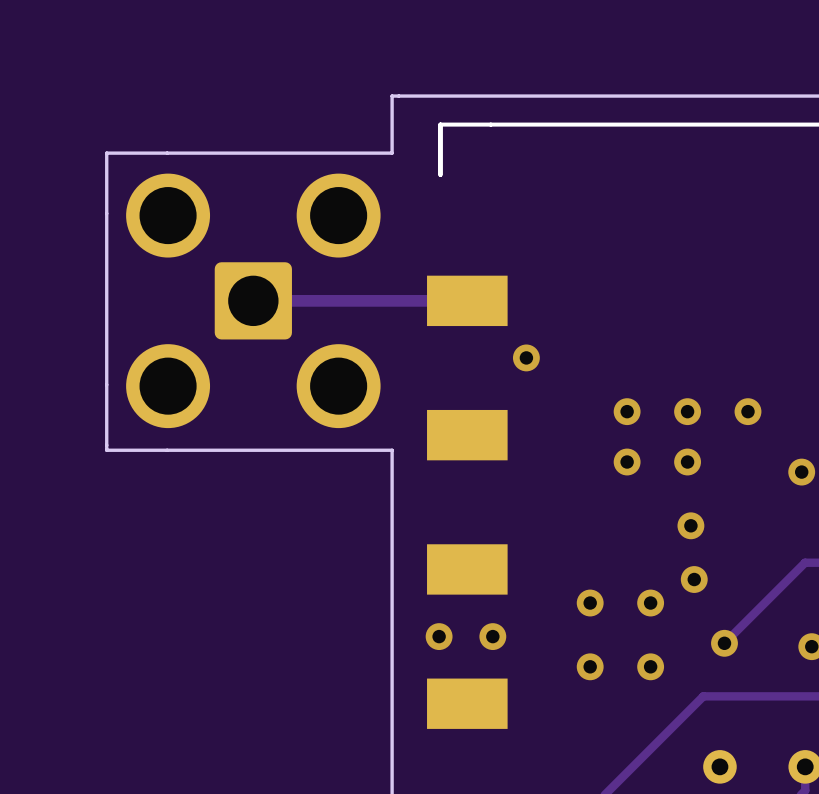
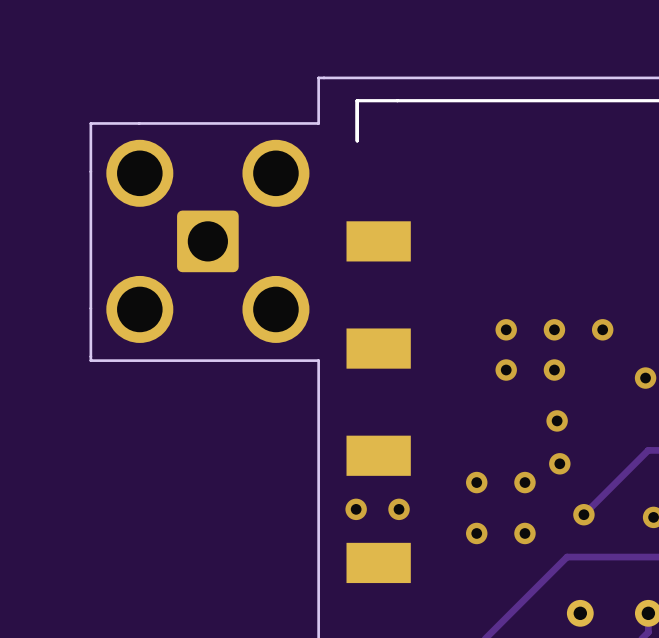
track: (467, 300) (253, 300) -> none
via: (526, 357) -> none

